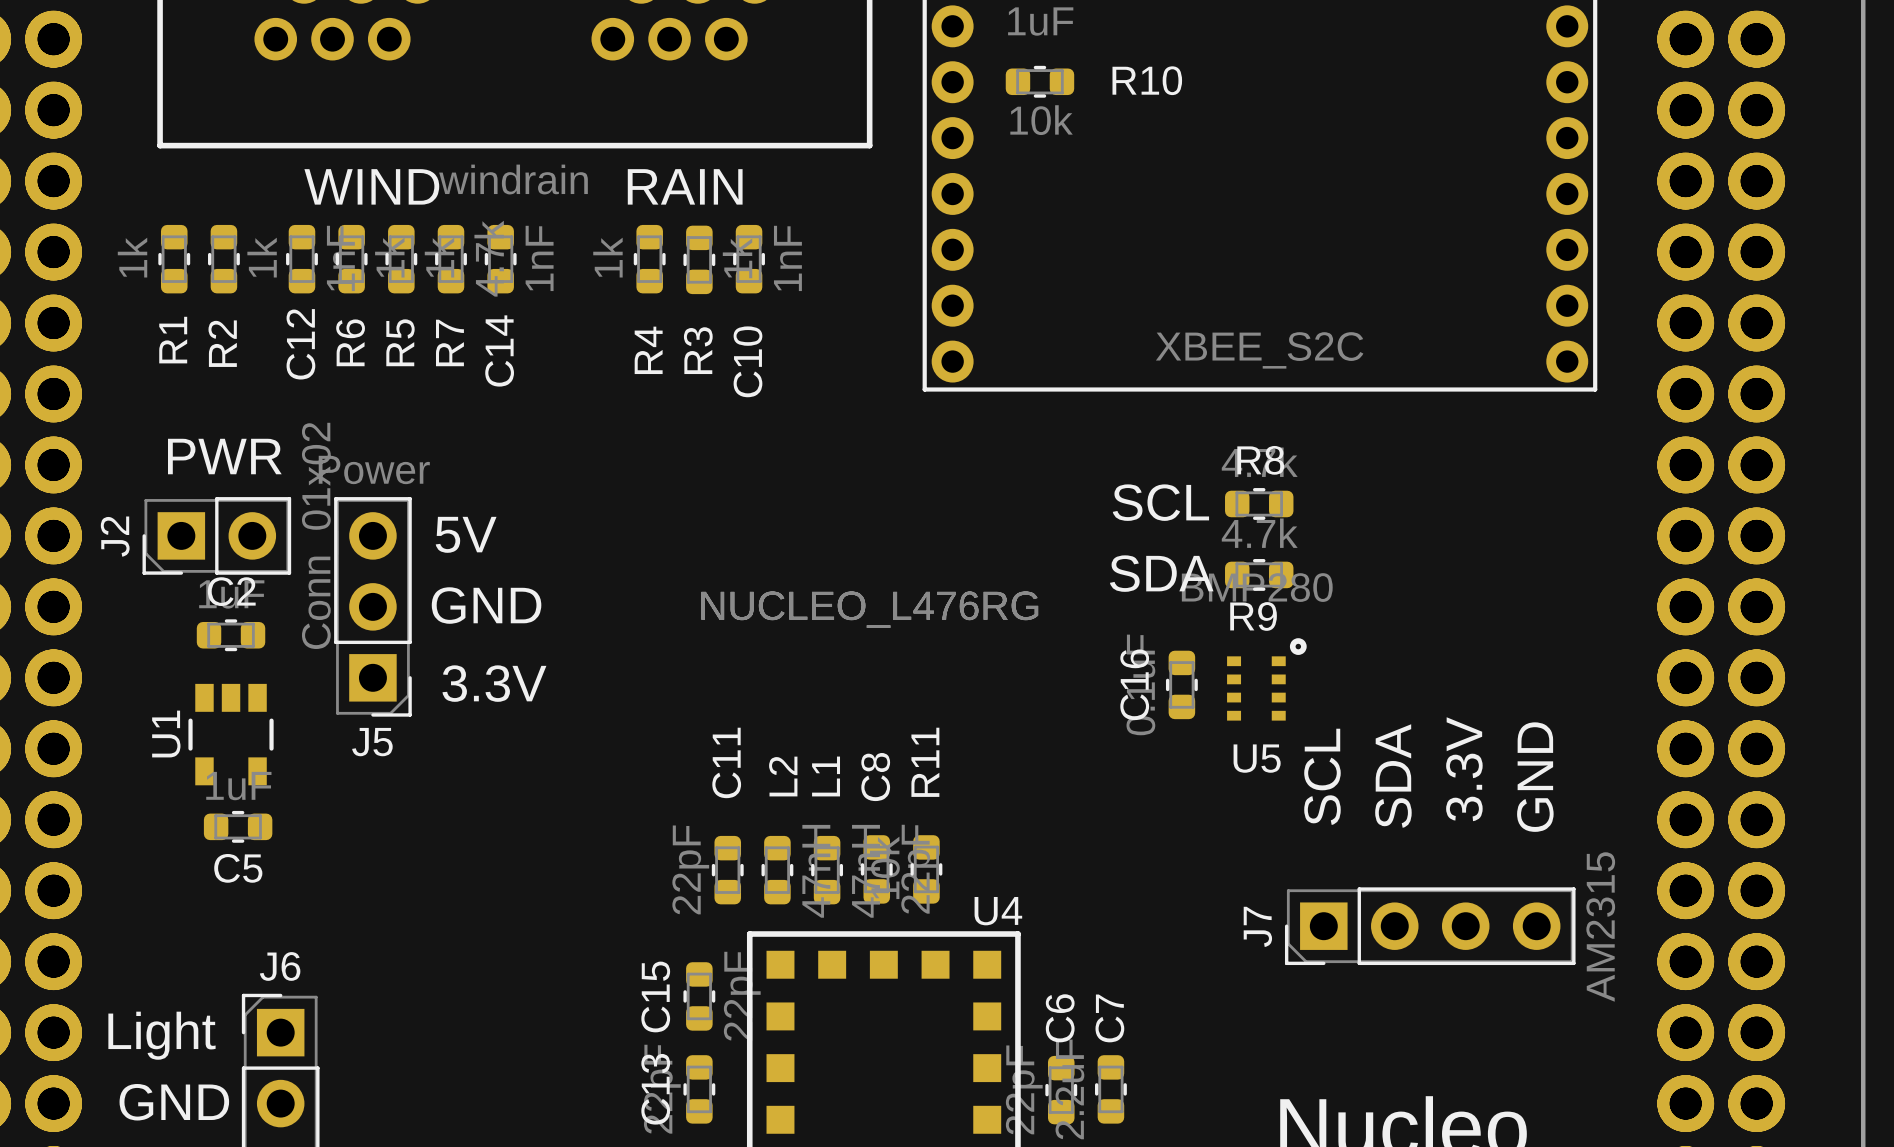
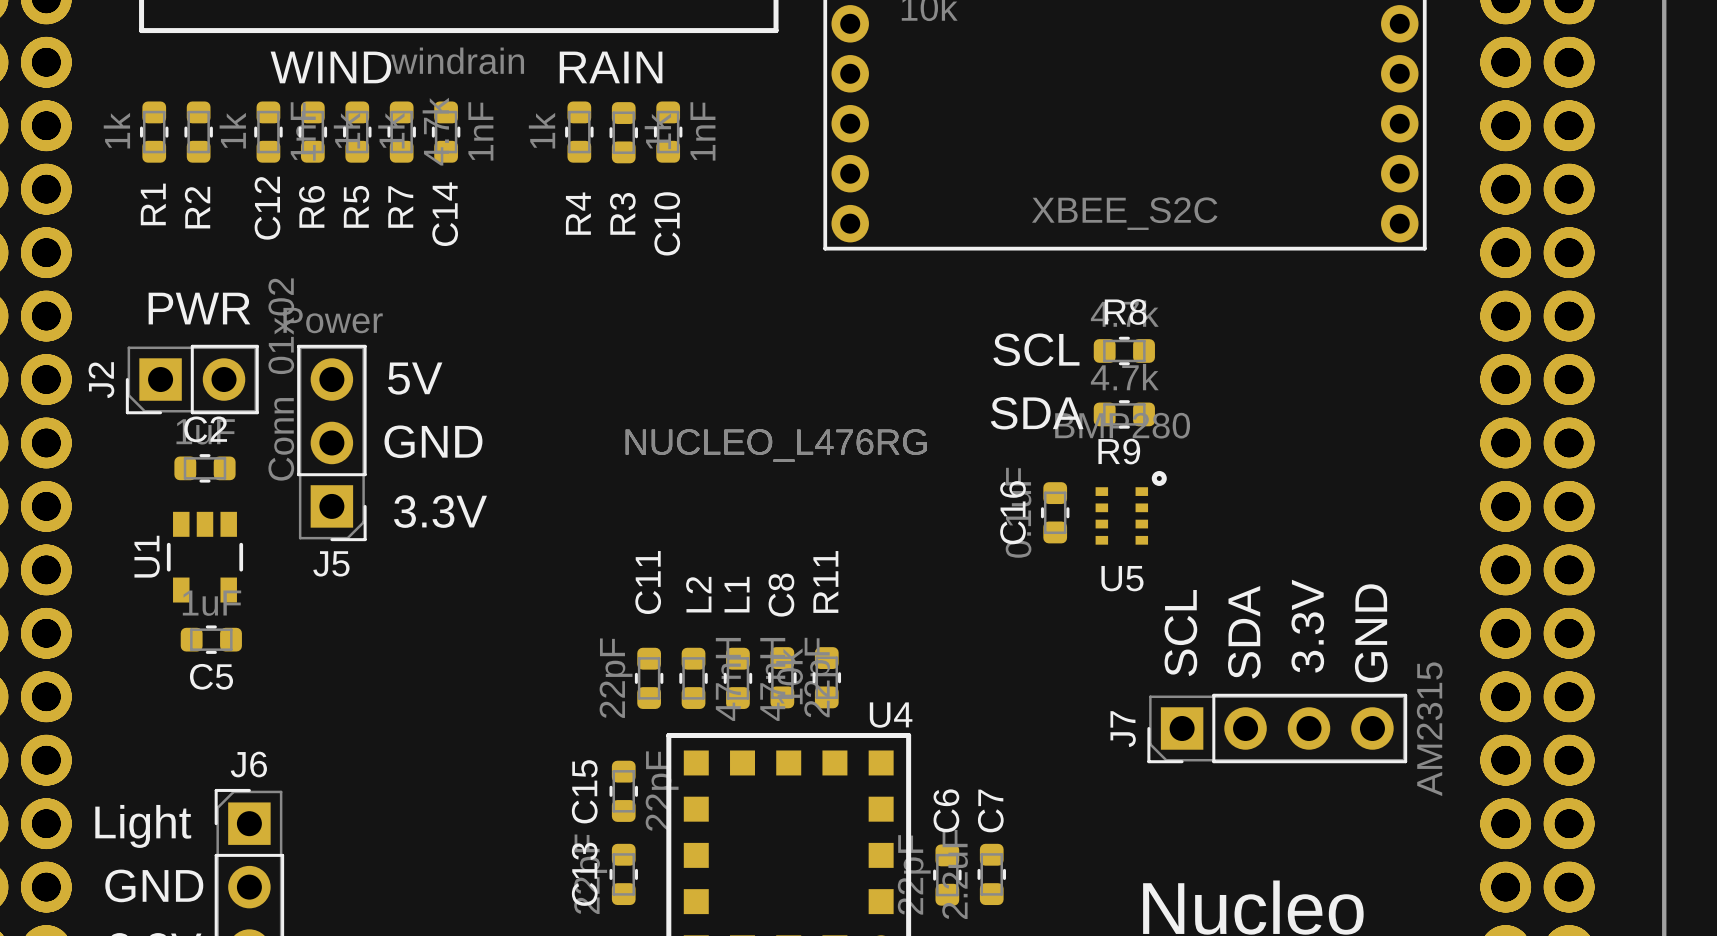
text position: 3.3V (1464, 769) -> 3.3V (1307, 626)
text position: SCL (1322, 776) -> SCL (1180, 633)
text position: SDA (1393, 776) -> SDA (1244, 632)
text position: GND (1535, 777) -> GND (1371, 633)

